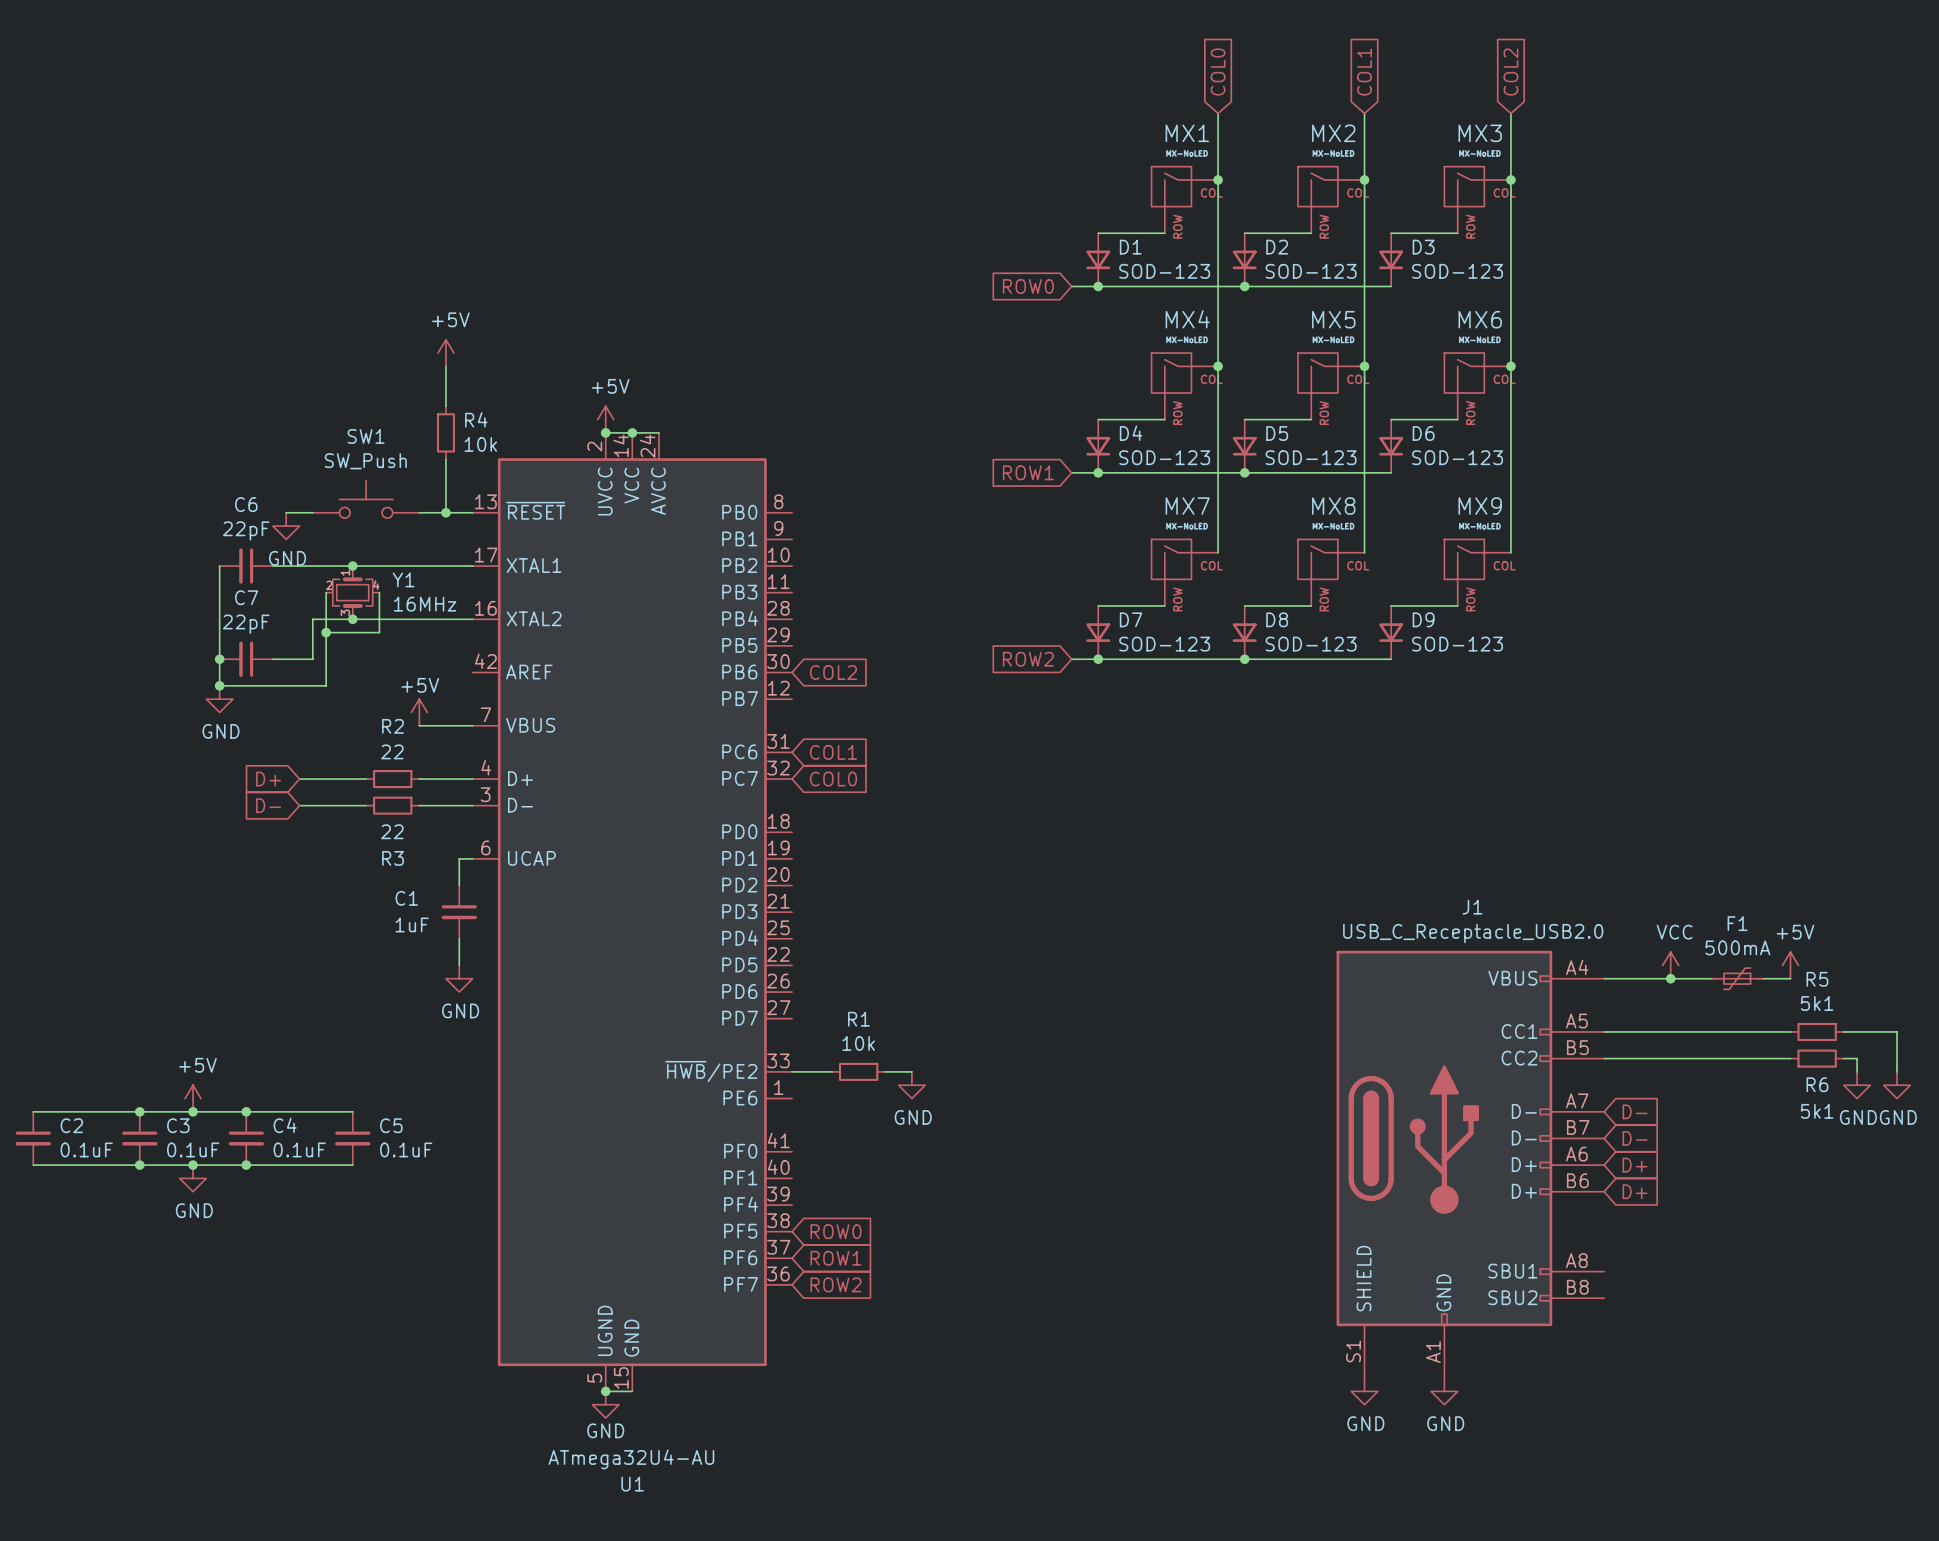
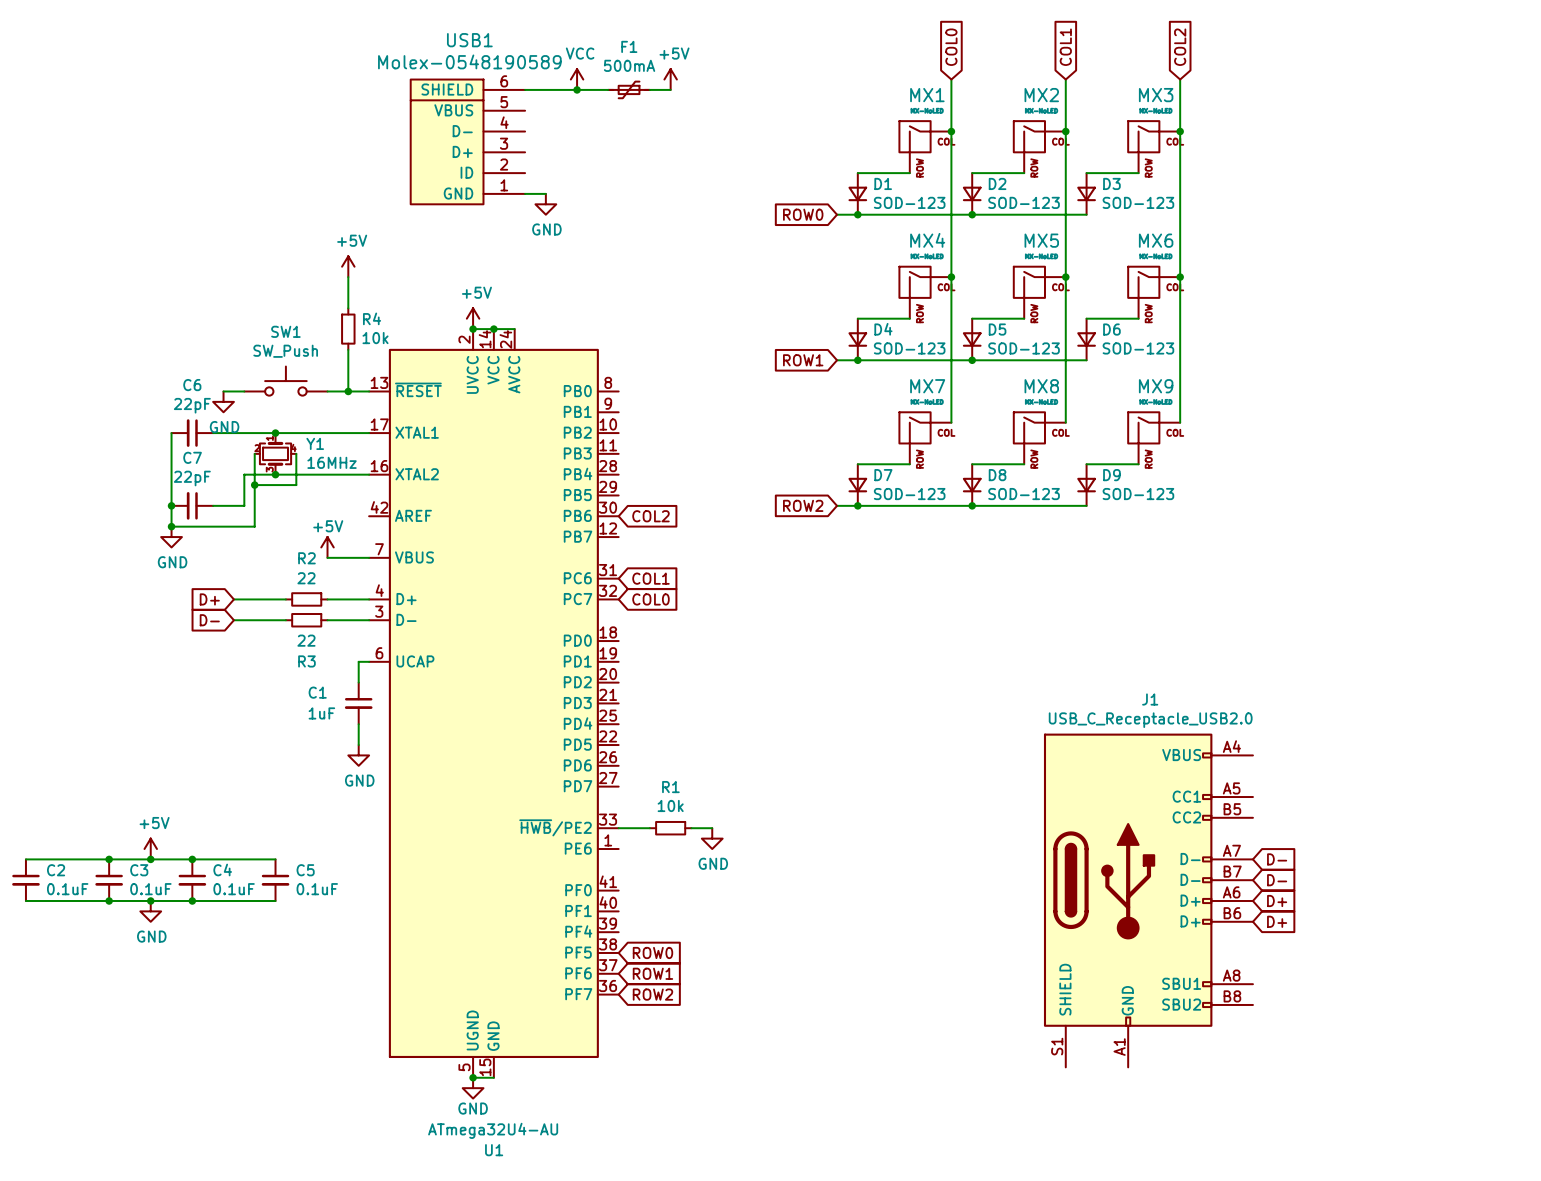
power symbol: none -> VCC (577, 79)
power symbol: none -> +5V (670, 79)
wire: none -> (525, 89) (608, 89)
junction: none -> (577, 89)
wire: none -> (649, 89) (670, 89)
USB1: none -> Molex-0548190589 (467, 141)
wire: none -> (525, 193) (545, 193)
power symbol: none -> GND (545, 204)
power symbol: VCC (1670, 965) -> none
power symbol: +5V (1790, 965) -> none
wire: (1604, 978) (1710, 978) -> none
junction: (1670, 978) -> none
F1 position: (1737, 978) -> (629, 89)
wire: (1763, 978) (1790, 978) -> none
wire: (1604, 1031) (1790, 1031) -> none
R5: 5k1 (1817, 1031) -> none
wire: (1843, 1031) (1897, 1031) (1897, 1071) -> none
wire: (1604, 1058) (1790, 1058) -> none
R6: 5k1 (1817, 1058) -> none
wire: (1843, 1058) (1857, 1058) (1857, 1071) -> none
power symbol: GND (1857, 1085) -> none
power symbol: GND (1897, 1085) -> none
power symbol: GND (1364, 1391) -> none
power symbol: GND (1444, 1391) -> none

